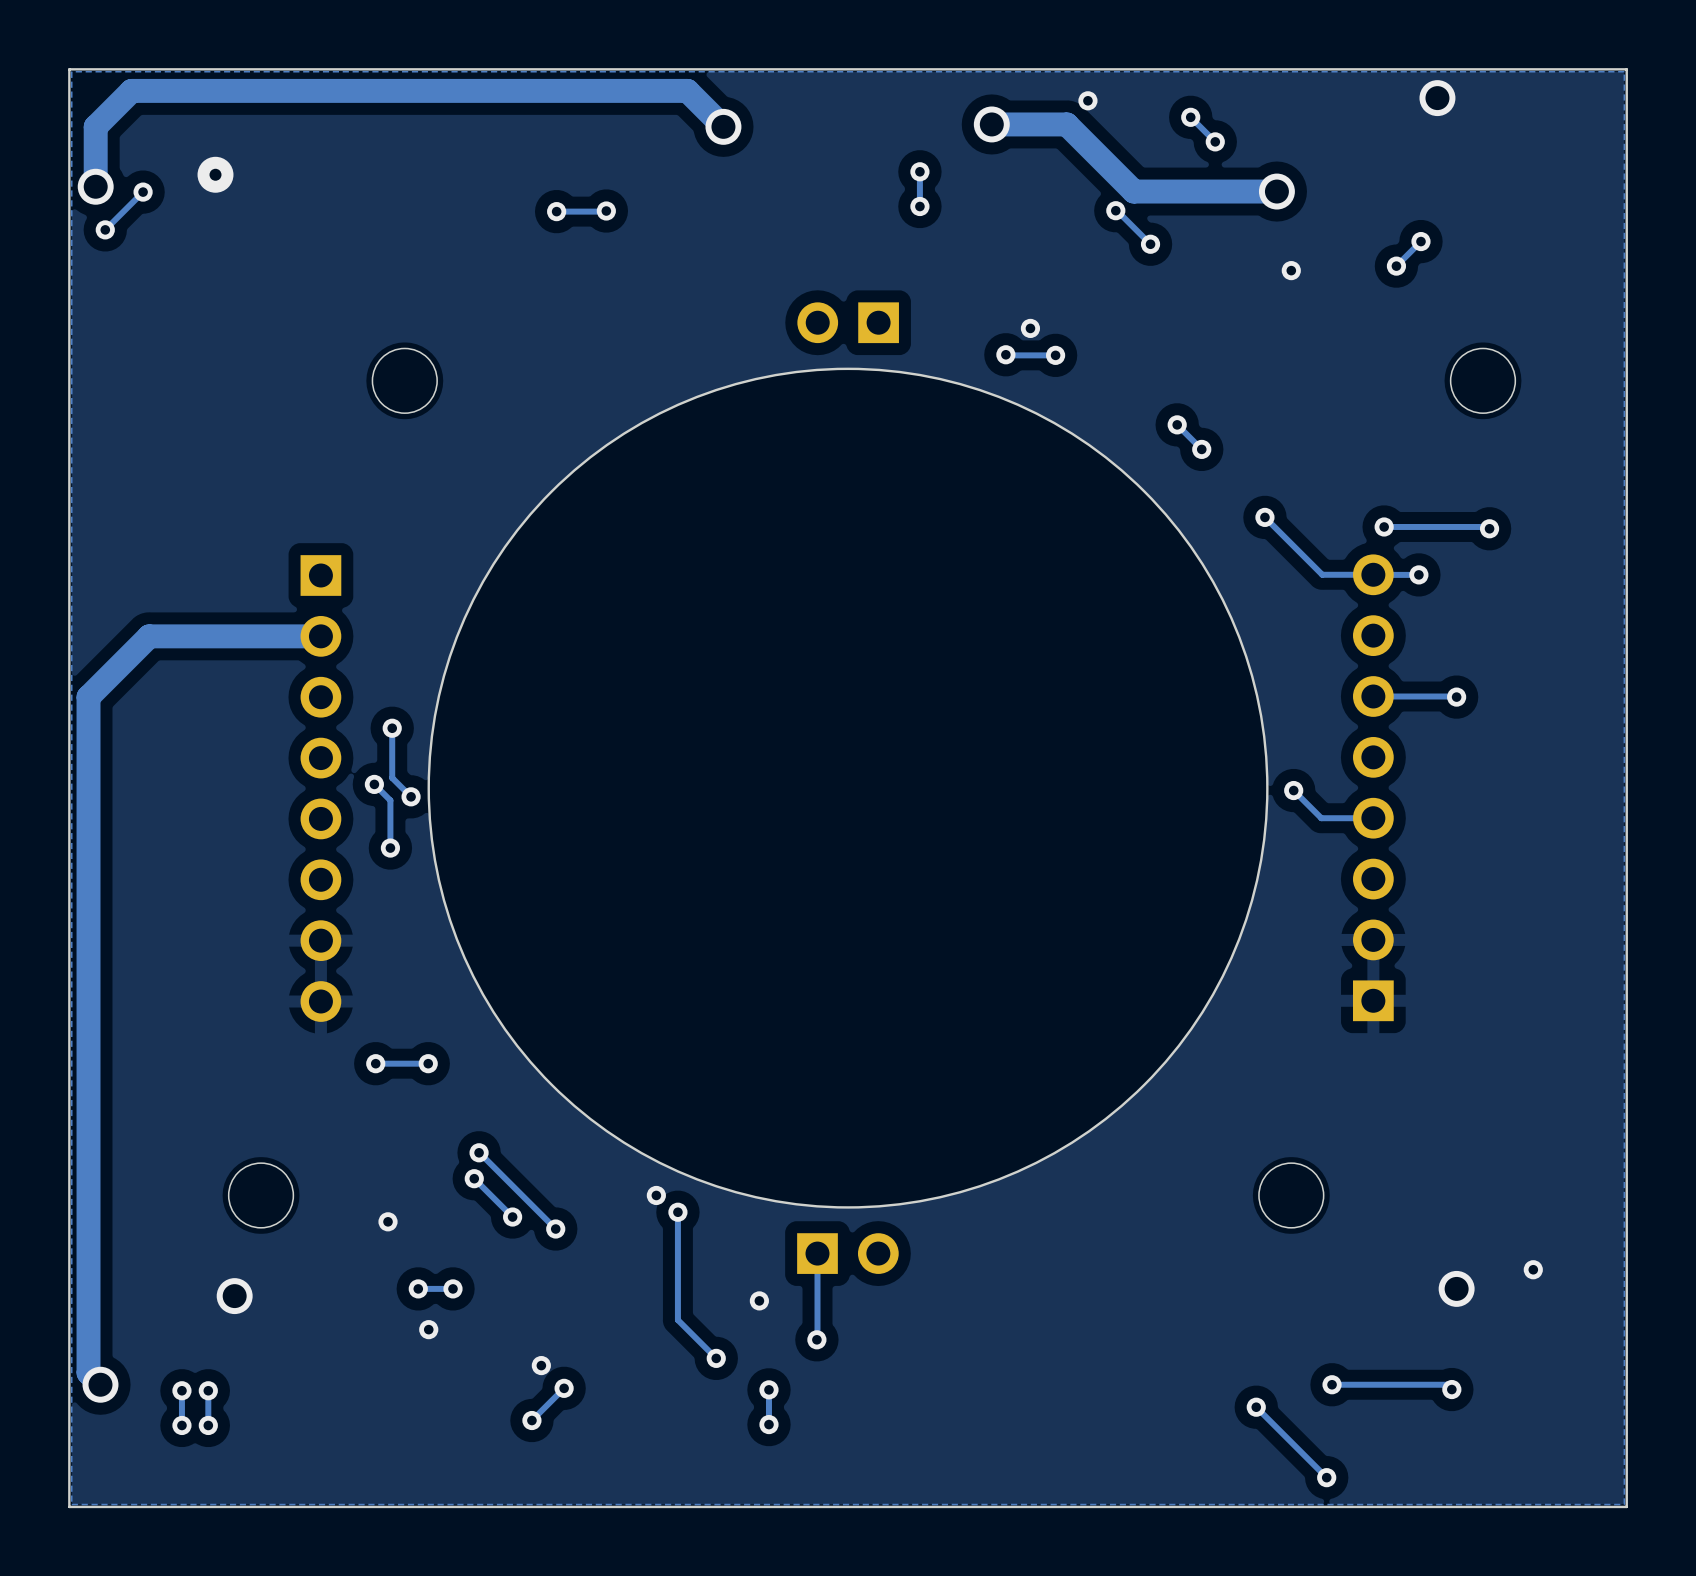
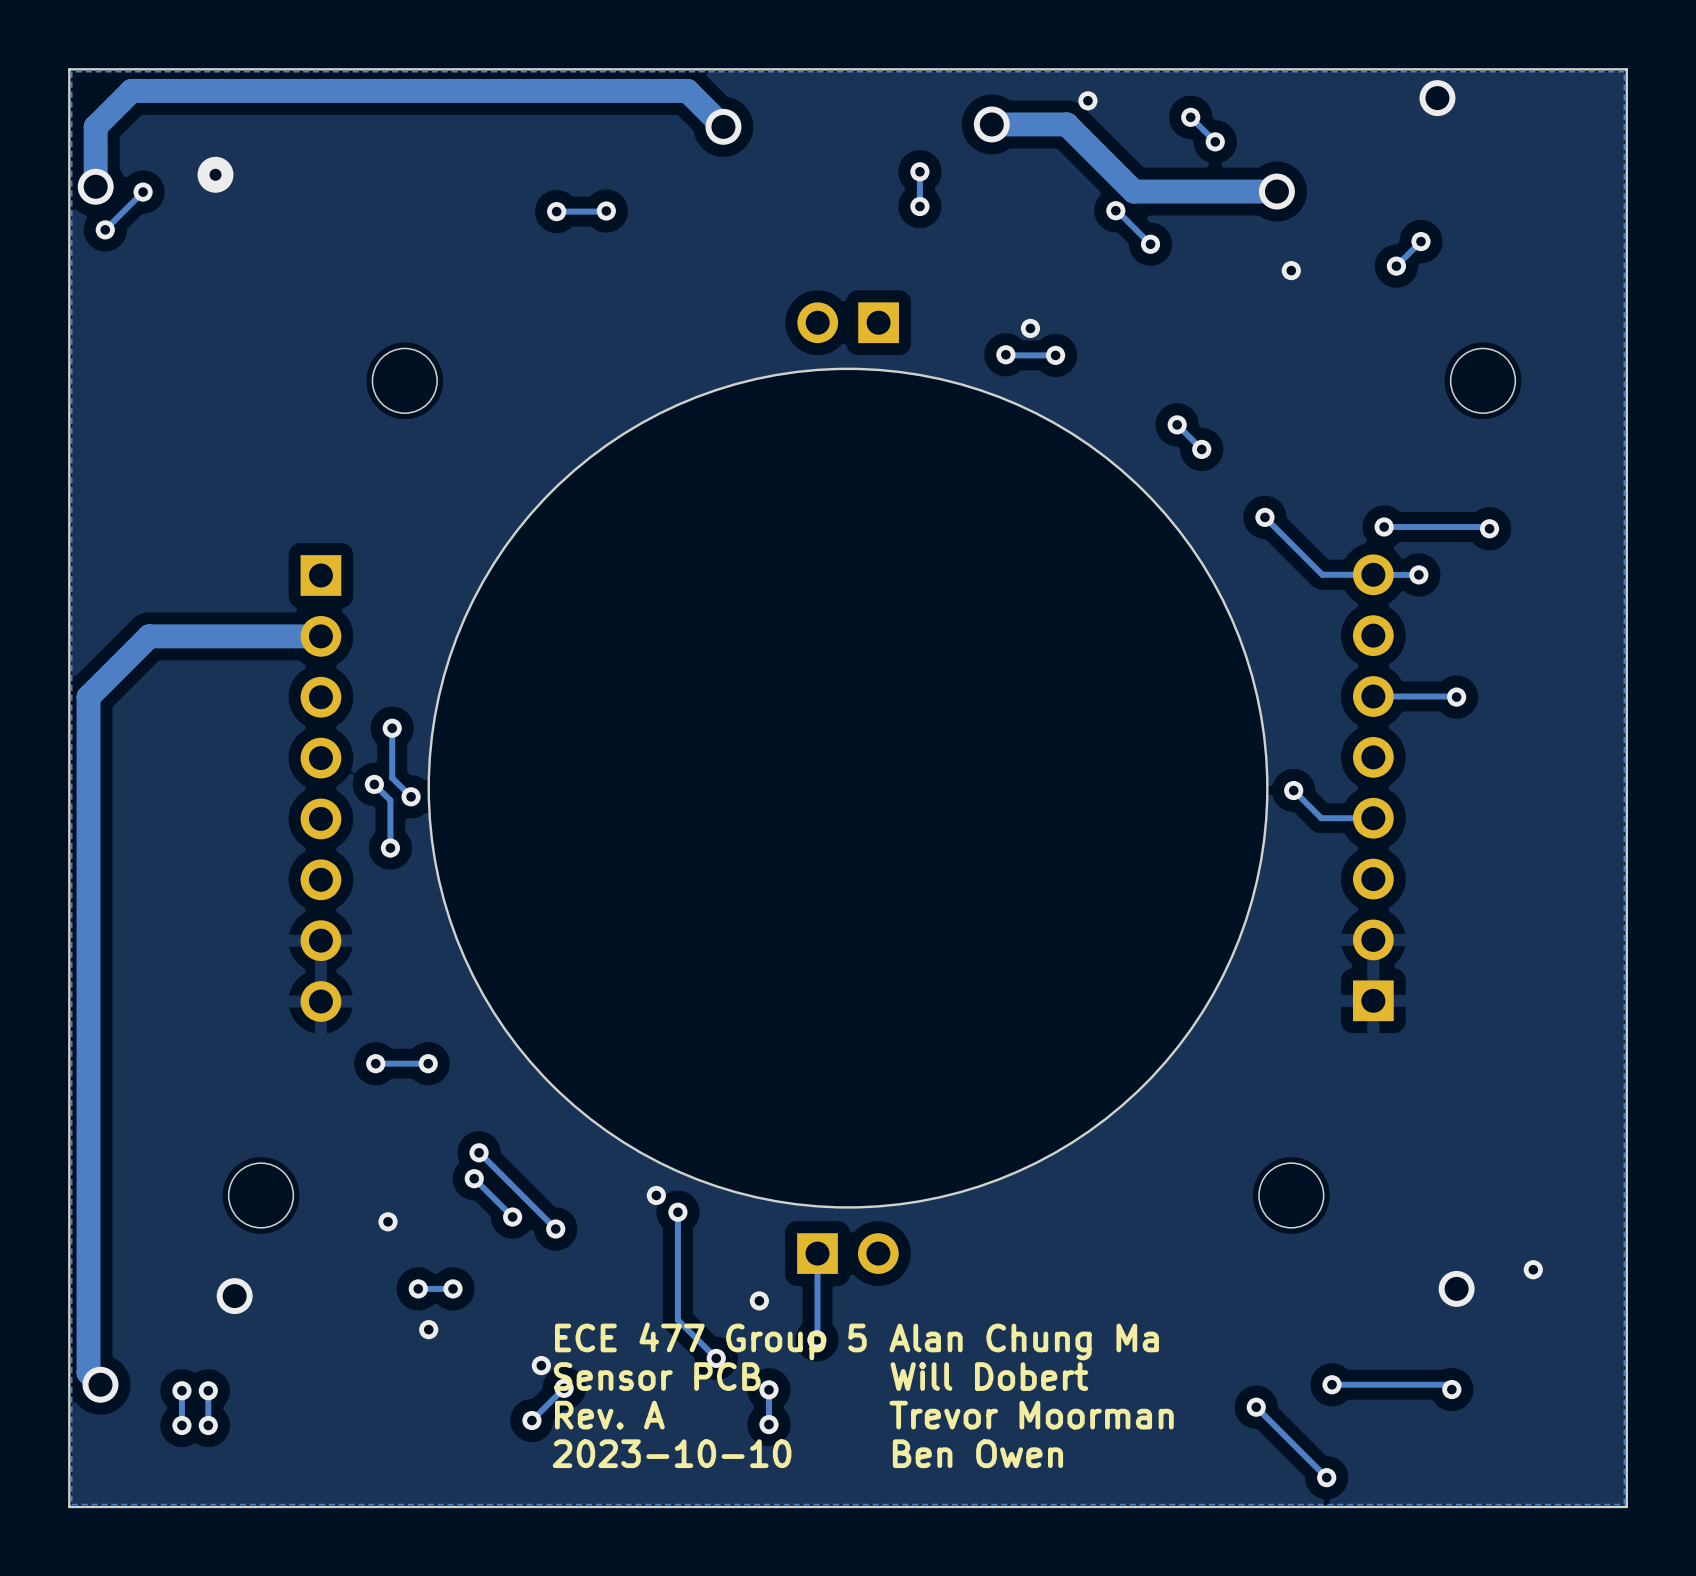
text: none -> ECE 477 Group 5 (710, 1341)
text: none -> Alan Chung Ma (1024, 1341)
text: none -> Sensor PCB (657, 1376)
text: none -> Will Dobert (989, 1376)
text: none -> Rev. A (609, 1415)
text: none -> Trevor Moorman (1031, 1415)
text: none -> 2023-10-10 (672, 1453)
text: none -> Ben Owen (977, 1453)

